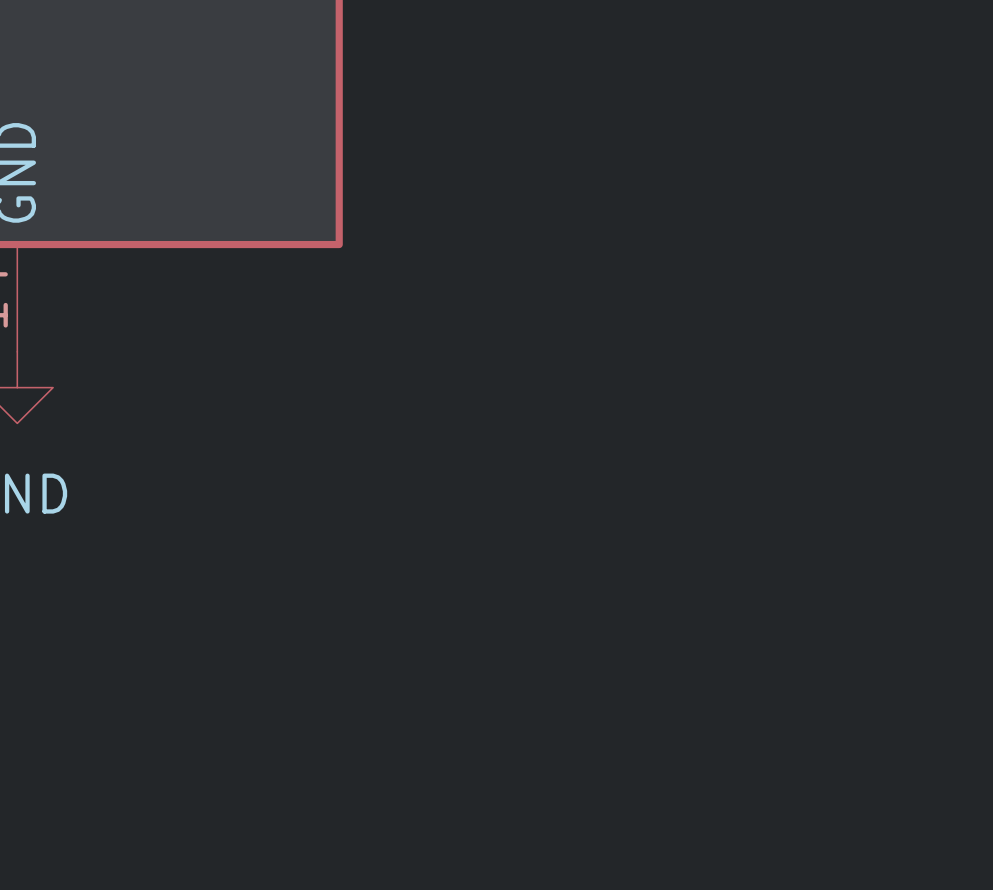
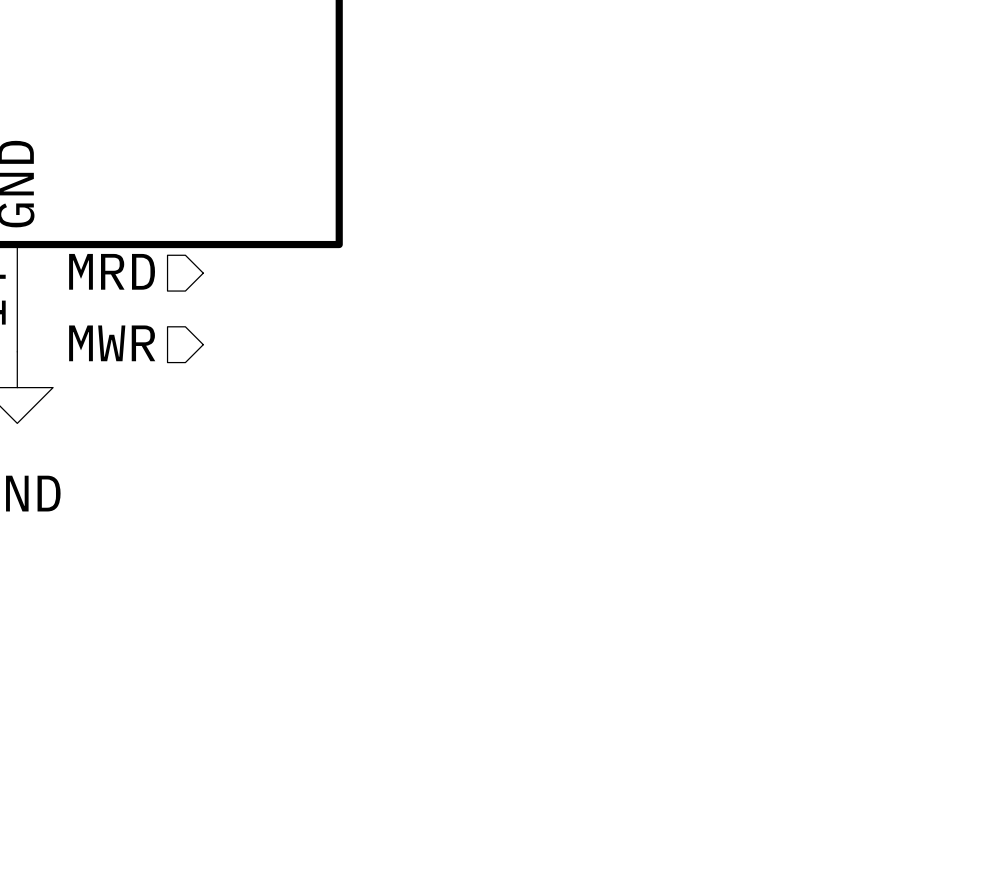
hierarchical label: none -> MRD (112, 271)
hierarchical label: none -> MWR (112, 343)

